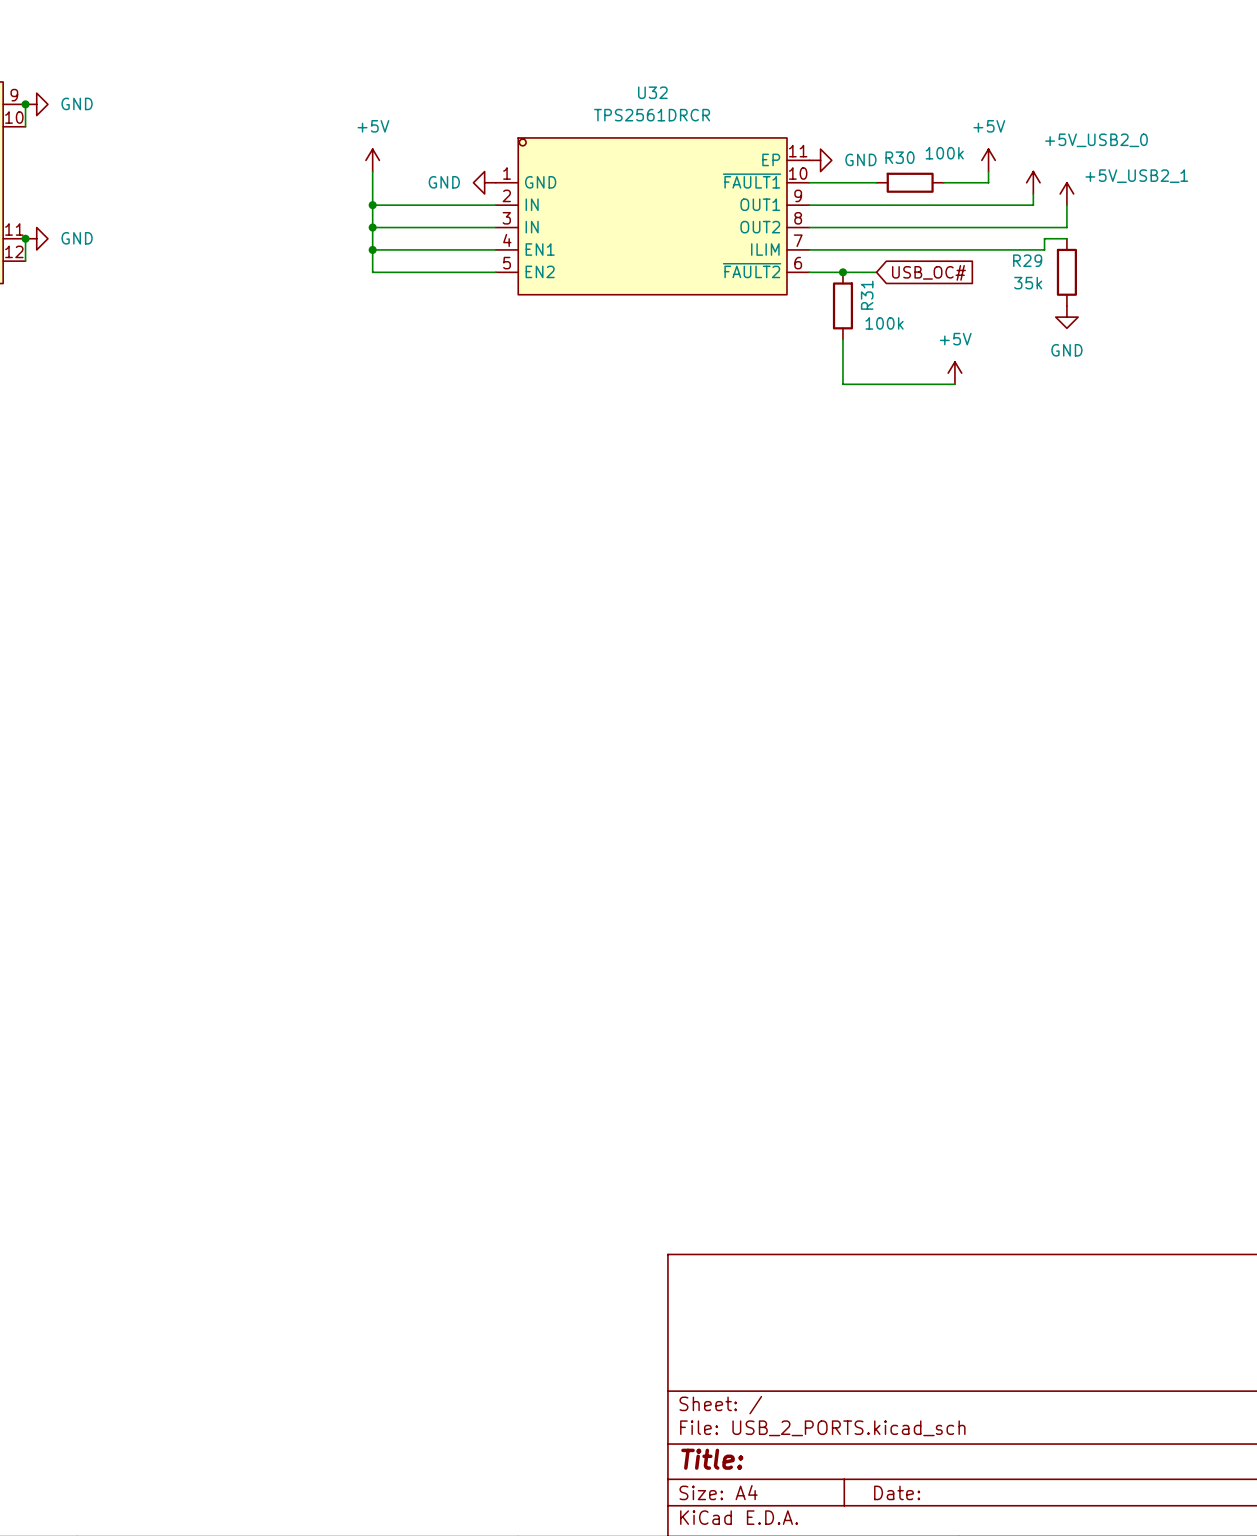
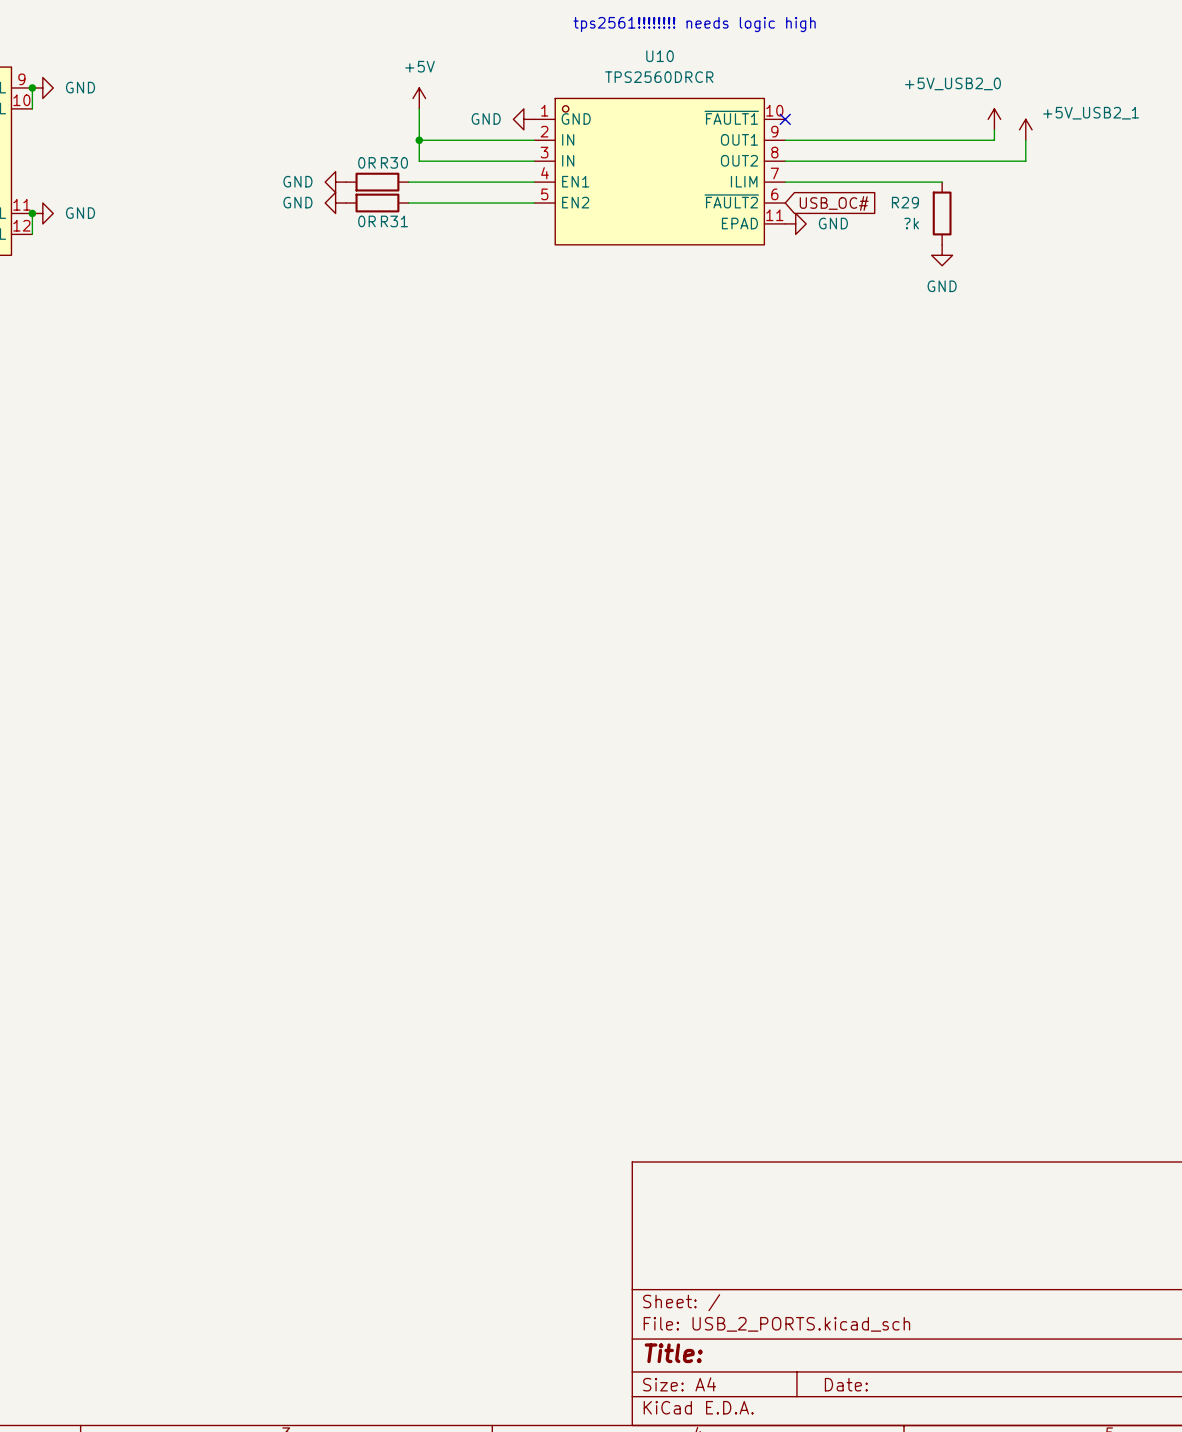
text: none -> tps2561!!!!!!!! needs logic high (694, 24)
wire: none -> (419, 108) (419, 161) (534, 161)
power symbol: none -> GND (523, 119)
no-connect mark: none -> (785, 119)
power symbol text position: +5V_USB2_0 (1096, 140) -> +5V_USB2_0 (953, 83)
wire: none -> (994, 129) (994, 140) (785, 140)
R30 value: 100k (944, 153) -> 0R (367, 162)
R30 name position: R30 (900, 157) -> R30 (394, 162)
power symbol position: +5V (372, 160) -> +5V (419, 98)
junction: none -> (419, 140)
power symbol position: GND (820, 160) -> GND (795, 223)
power symbol: +5V (988, 160) -> none
wire: (372, 171) (372, 272) (495, 272) -> none
wire: (988, 171) (988, 182) -> (1025, 140) (1025, 161) (931, 161)
power symbol: GND (484, 182) -> none
R30 position: (910, 182) -> (377, 182)
power symbol position: +5V_USB2_0 (1033, 182) -> +5V_USB2_0 (994, 119)
U10: none -> TPS2560DRCR (659, 171)
wire: (1033, 193) (1033, 205) (999, 205) -> none
power symbol position: +5V_USB2_1 (1066, 193) -> +5V_USB2_1 (1025, 129)
power symbol: none -> GND (335, 182)
wire: (372, 205) (428, 205) -> none
junction: (372, 205) -> none
wire: (1066, 205) (1066, 227) (809, 227) -> none
U32: TPS2561DRCR (652, 216) -> none
power symbol: none -> GND (335, 203)
wire: (372, 227) (428, 227) -> none
junction: (372, 227) -> none
wire: (1066, 238) (1044, 238) (1044, 249) (809, 249) -> none
wire: (372, 249) (495, 249) -> (419, 140) (534, 140)
junction: (372, 249) -> none
wire: (809, 272) (876, 272) -> (827, 161) (889, 161)
junction: (842, 272) -> none
global label position: USB_OC# (928, 272) -> USB_OC# (834, 203)
R29 position: (1066, 272) -> (942, 213)
R29 value: 35k (1028, 283) -> ?k (911, 223)
R31 rotation: 0° (842, 305) -> 90° clockwise (377, 203)
R31 position: (842, 305) -> (377, 203)
power symbol position: GND (1066, 317) -> GND (942, 255)
R31 value: 100k (884, 323) -> 0R (367, 221)
wire: (842, 339) (842, 384) (954, 384) -> none
power symbol: +5V (954, 373) -> none

